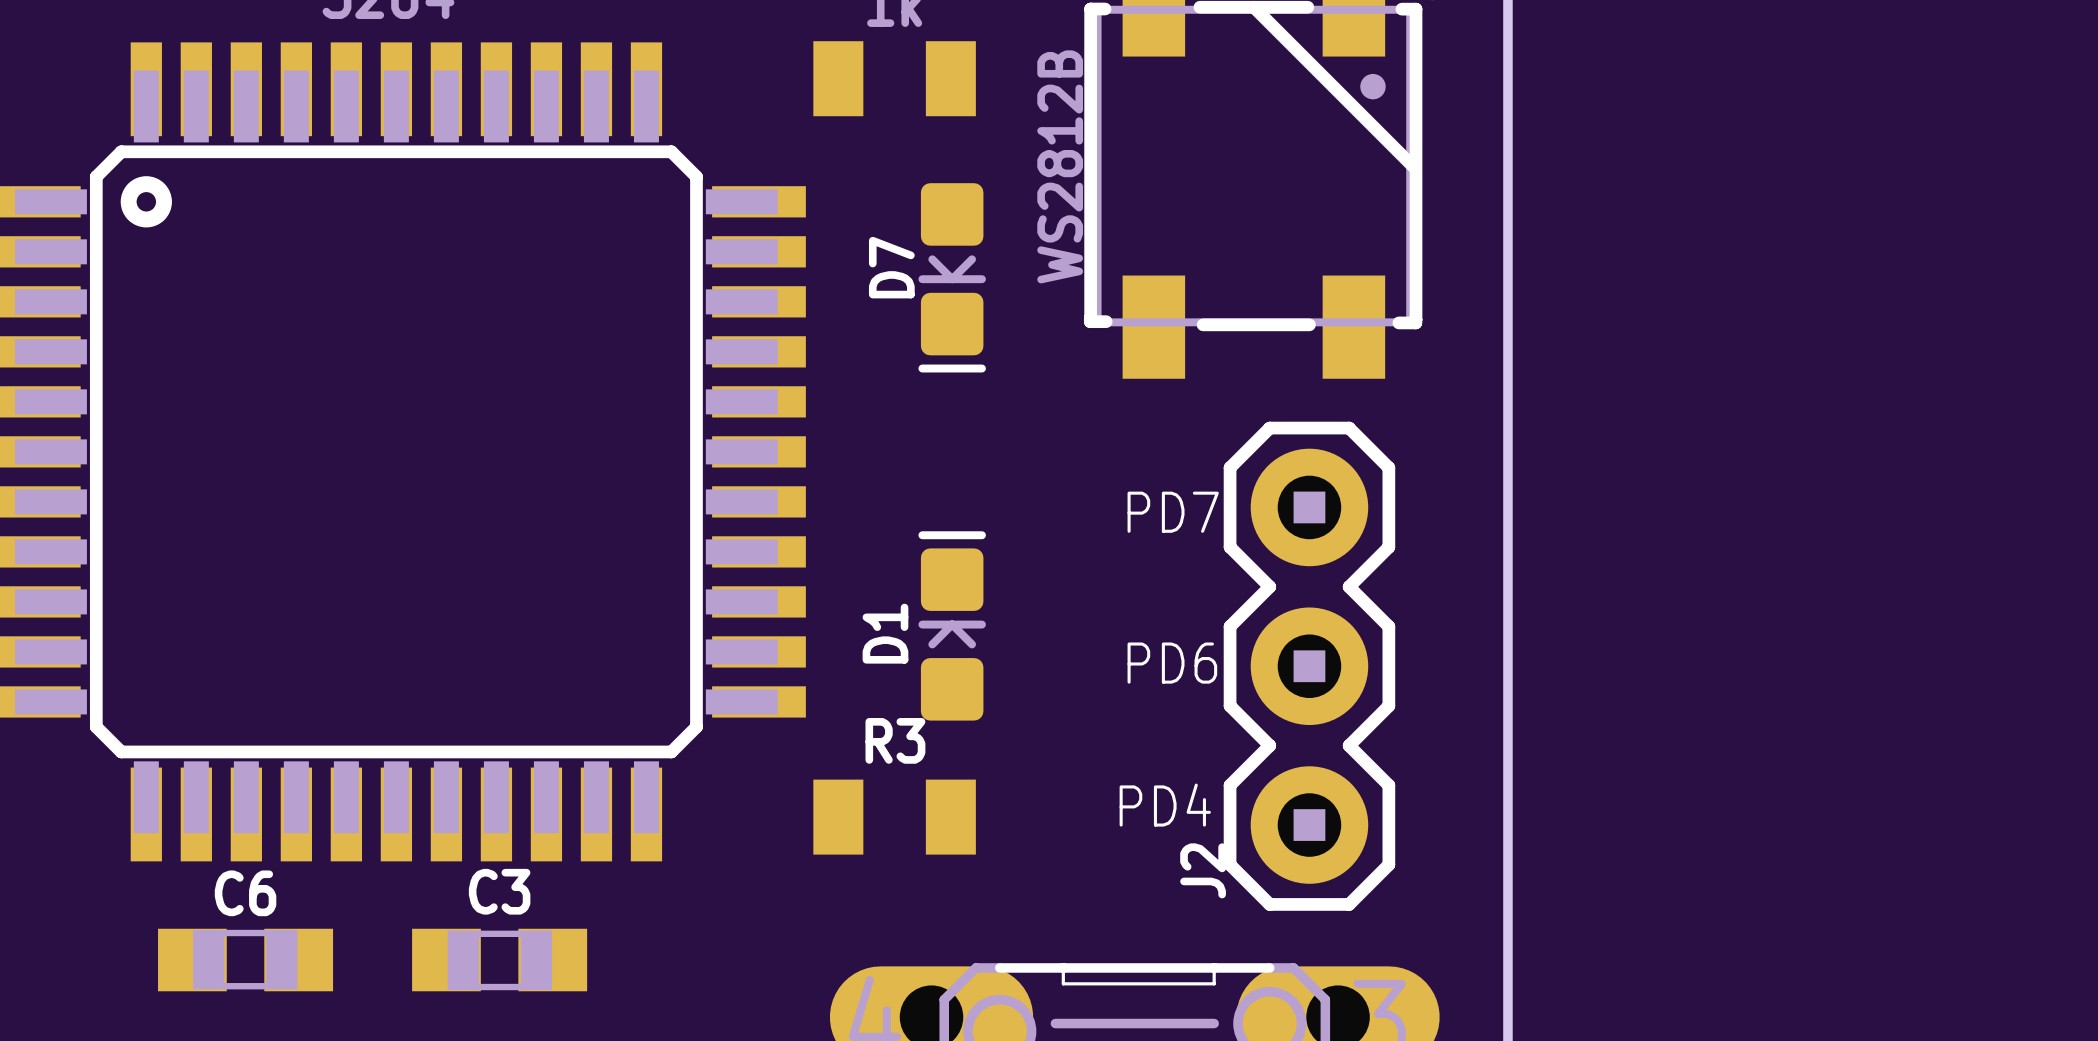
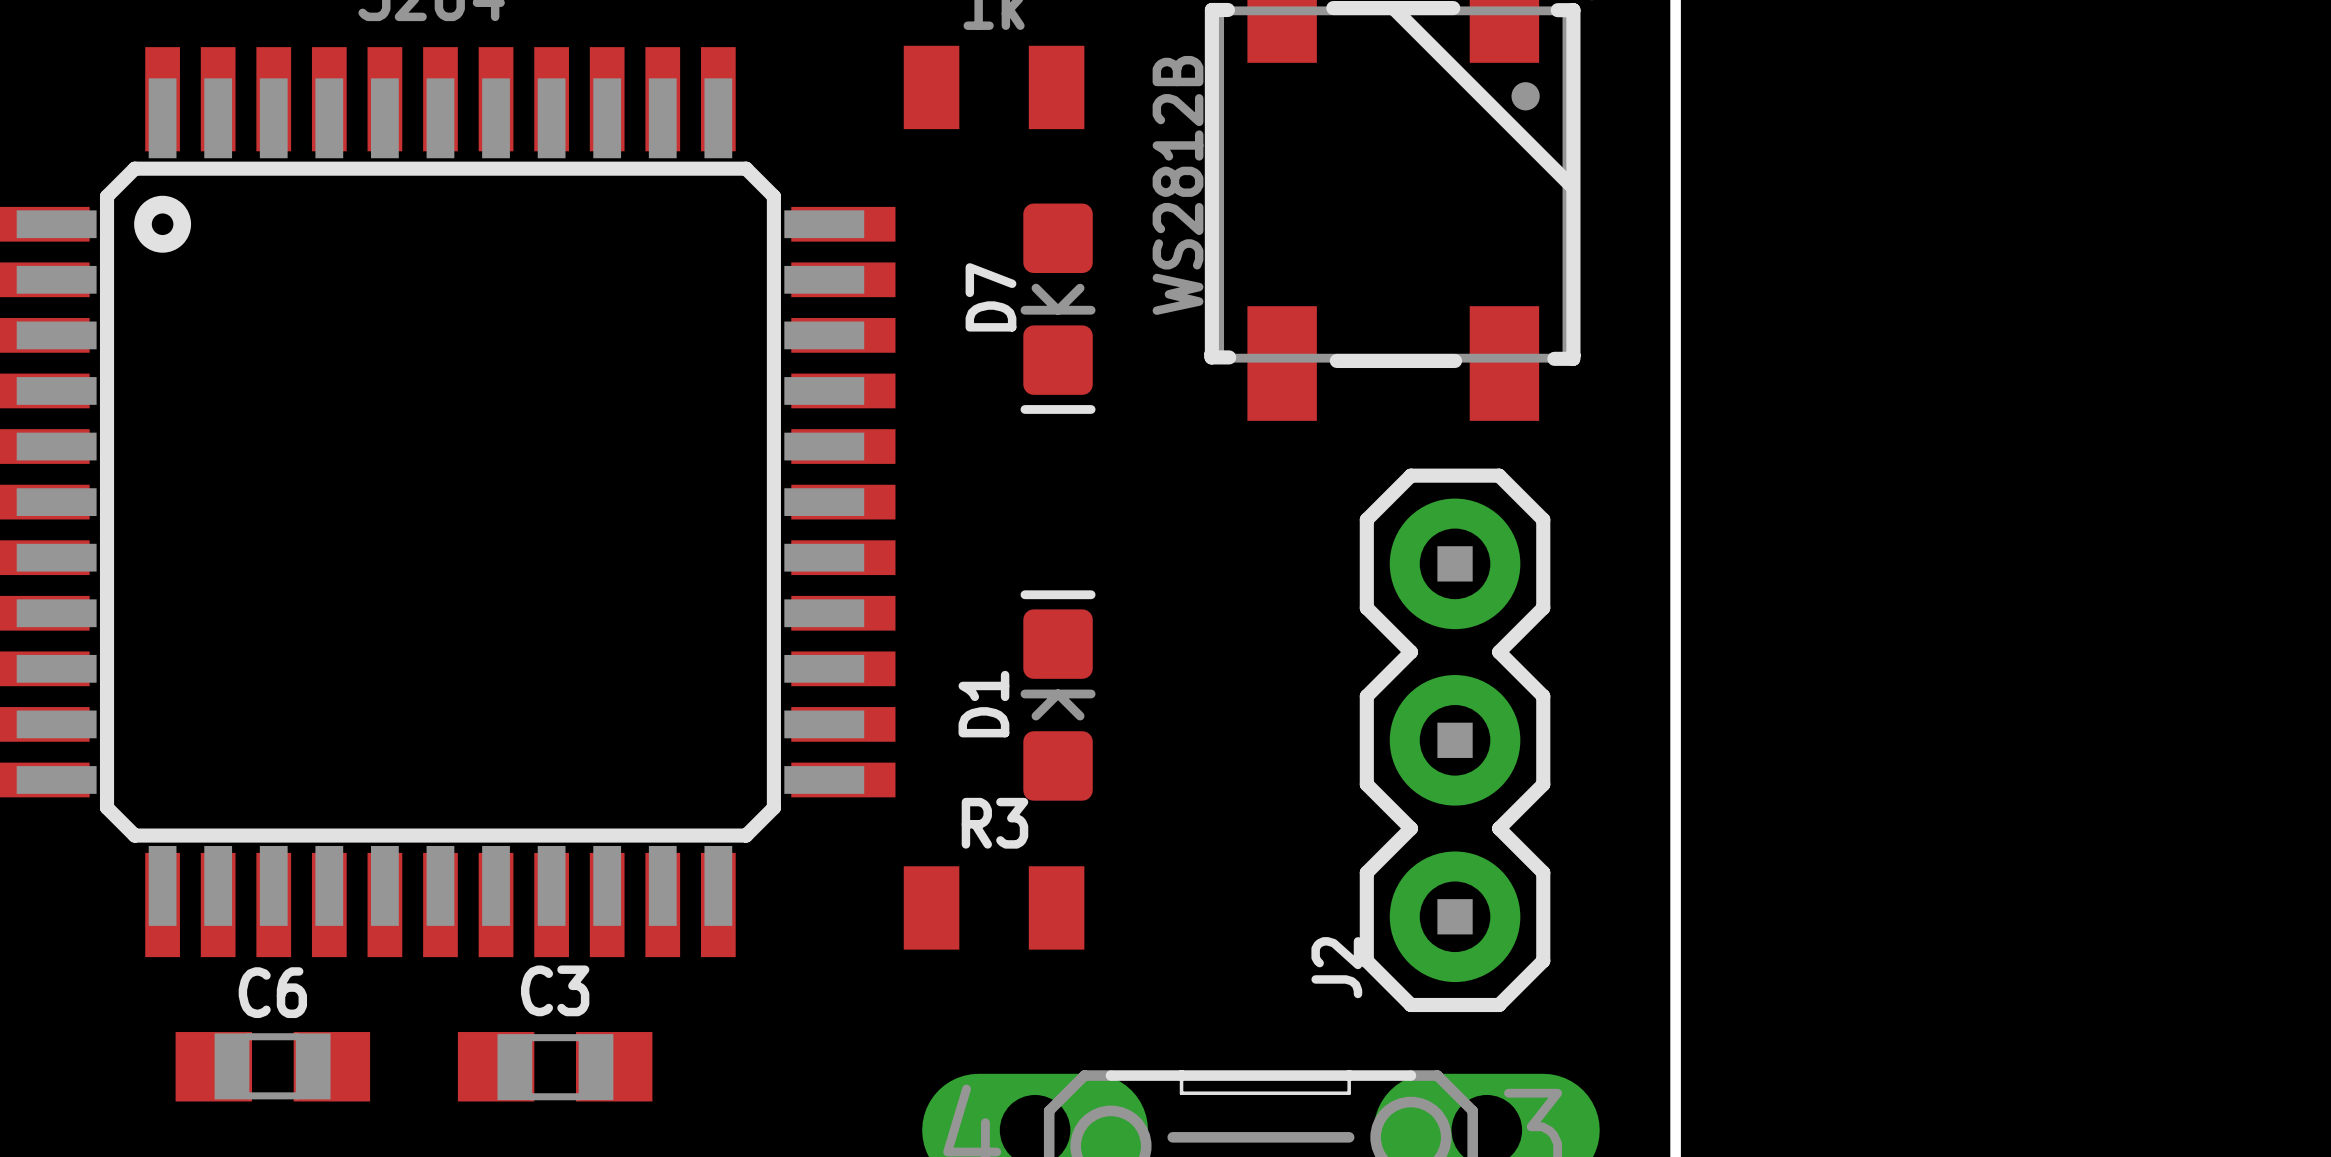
text: PD7 (1173, 512) -> none
text: PD6 (1172, 663) -> none
text: PD4 (1165, 805) -> none

